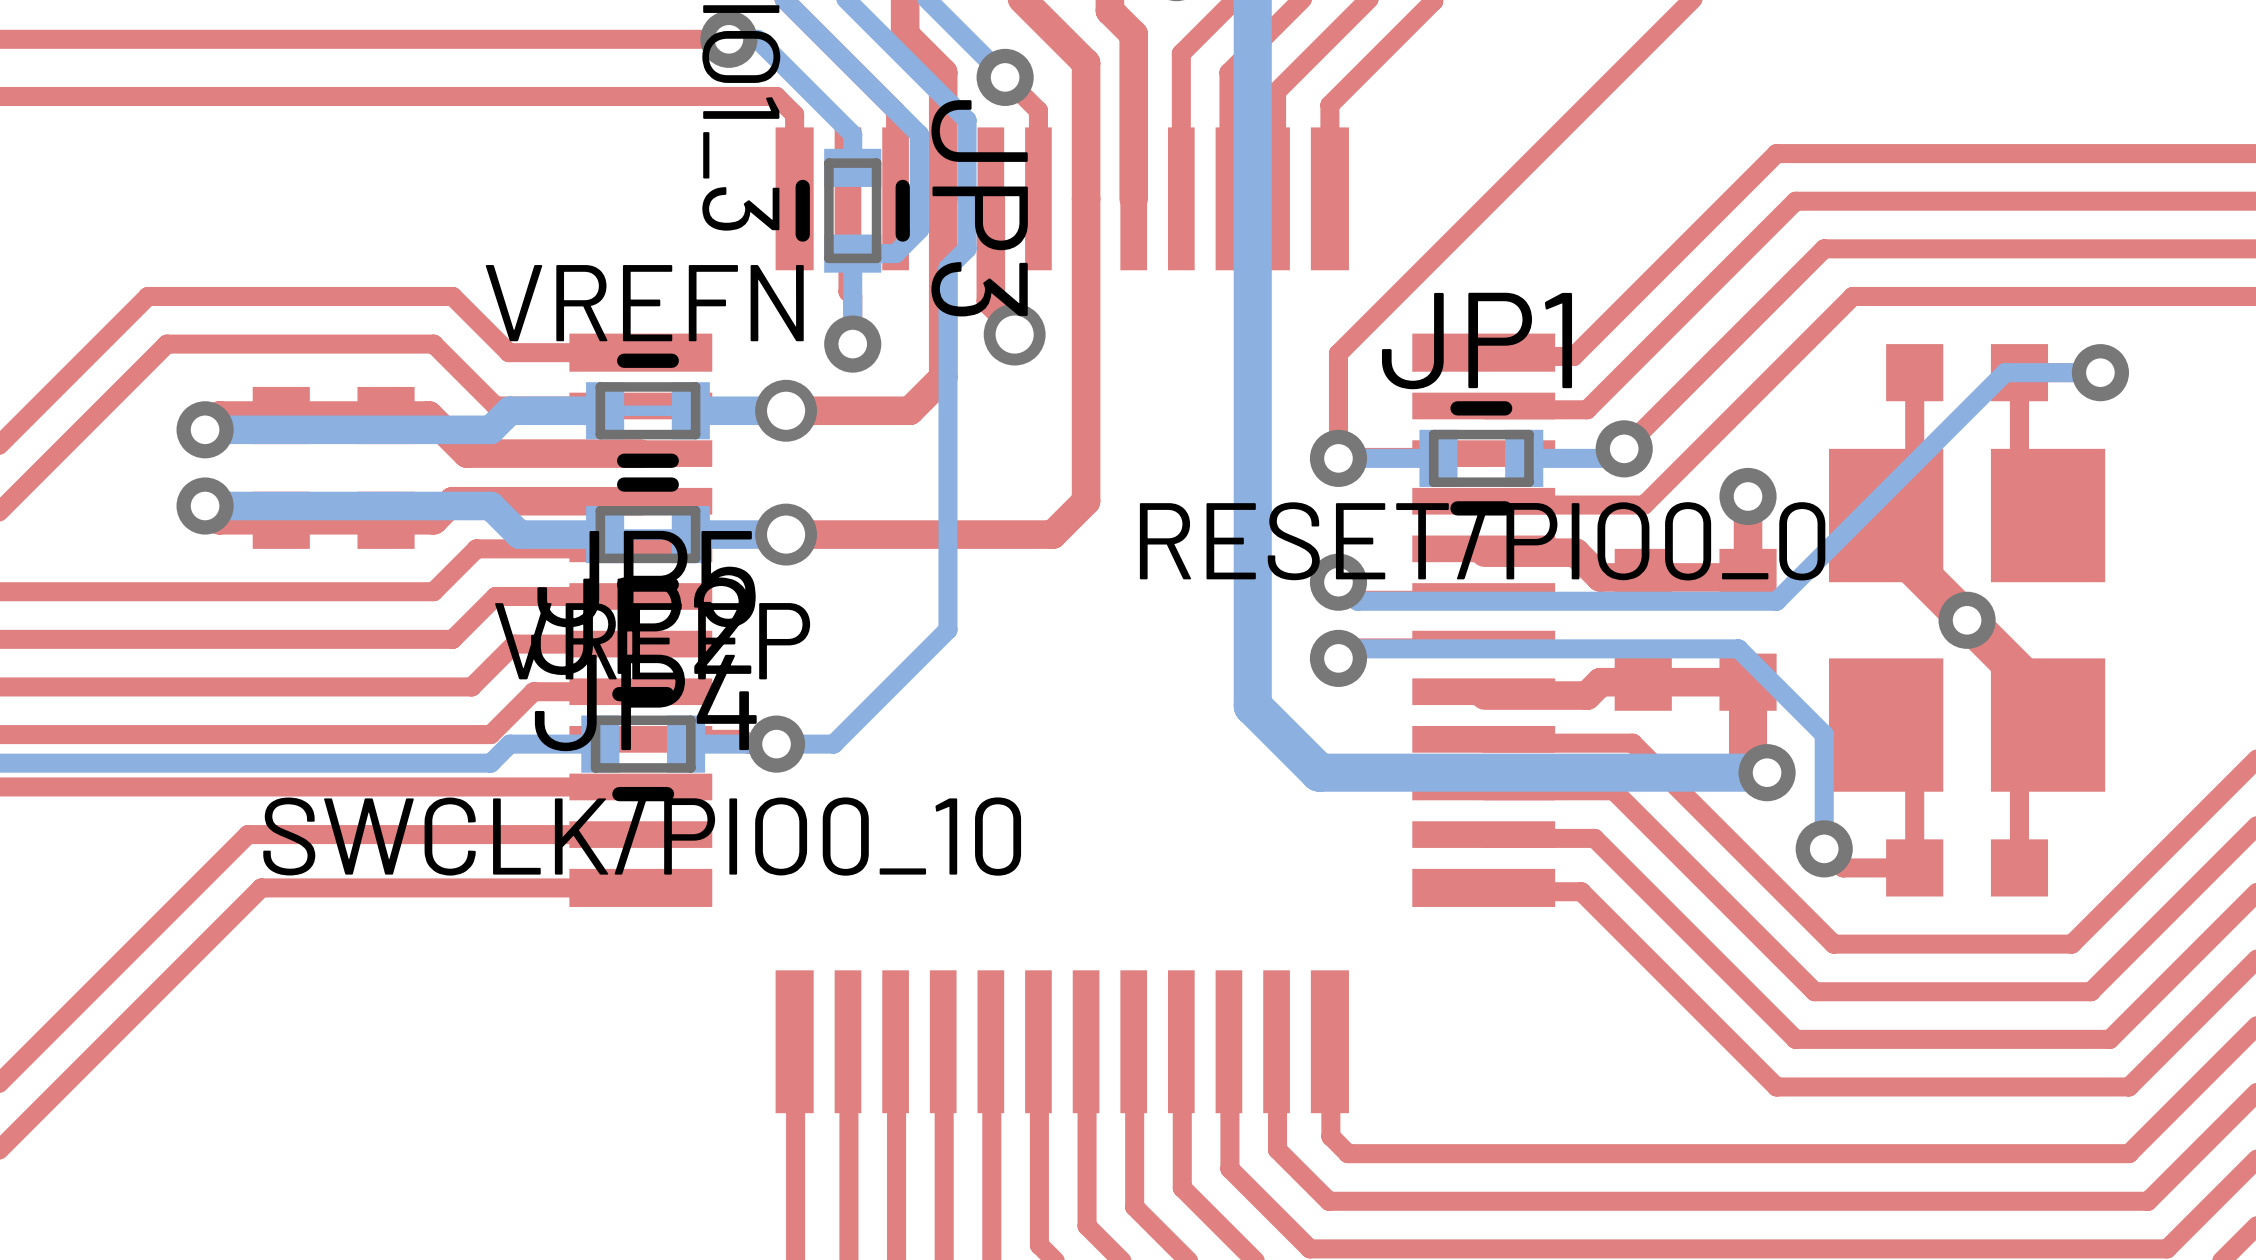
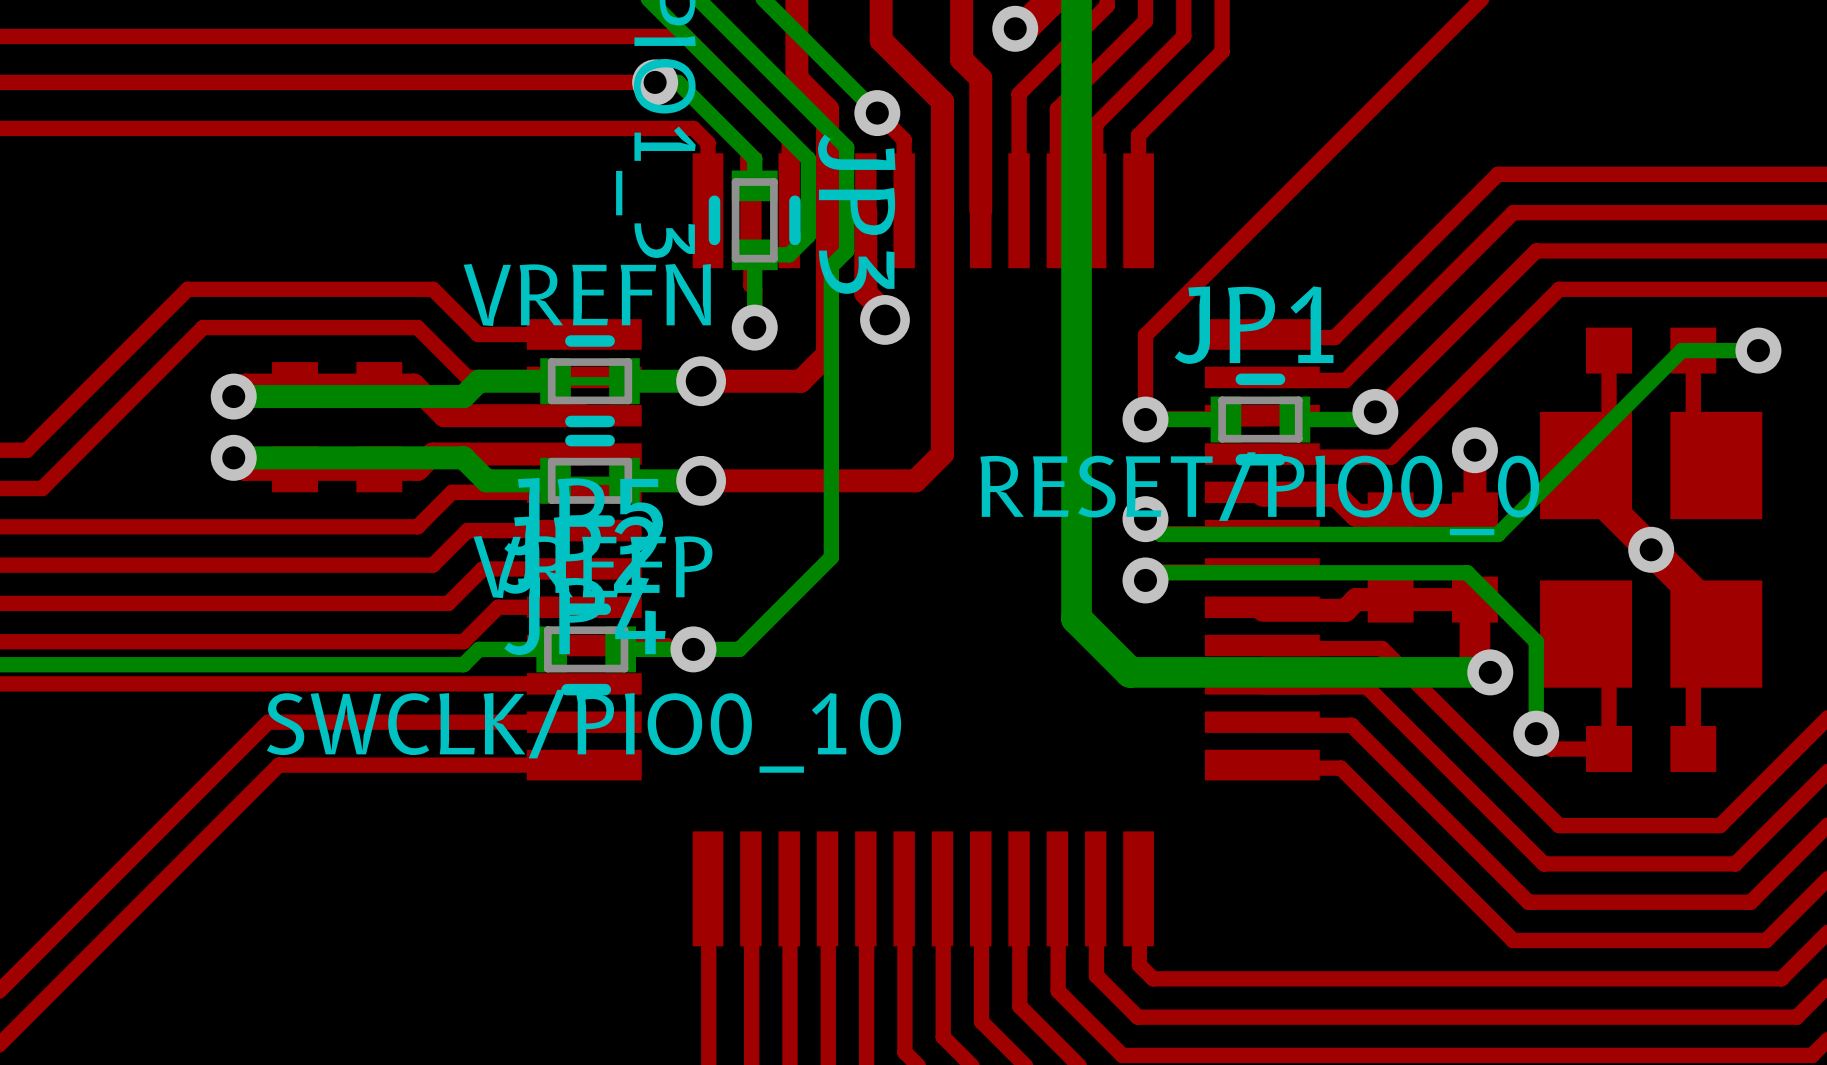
top track: (2071, 944) (1833, 944) -> (1735, 810) (1720, 825) (1559, 825) (1543, 810)
top track: (2090, 991) (1814, 991) -> (1750, 848) (1735, 863) (1543, 863) (1528, 848)
top track: (2109, 1039) (1795, 1039) -> (1766, 886) (1750, 902) (1528, 902) (1513, 886)
top track: (2129, 1086) (1776, 1086) -> (1781, 925) (1766, 940) (1513, 940) (1497, 925)

